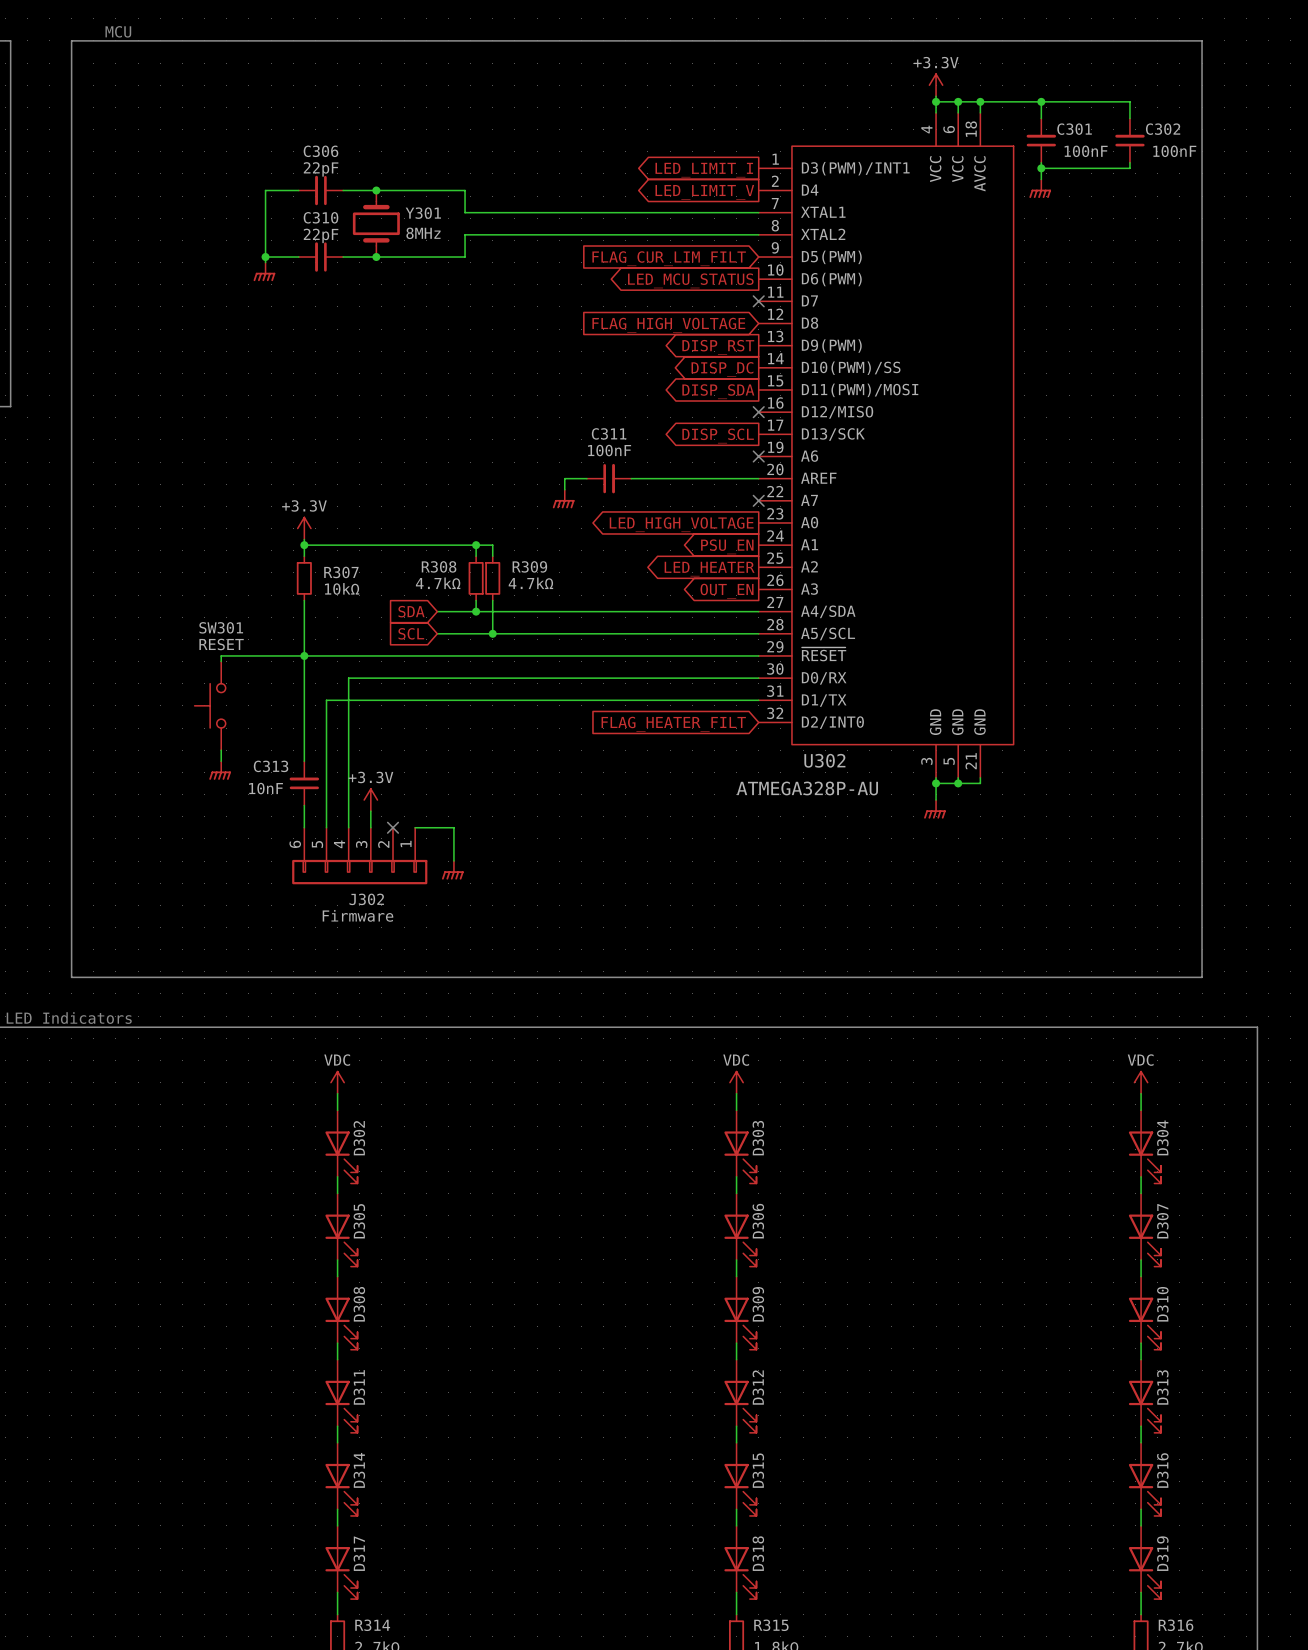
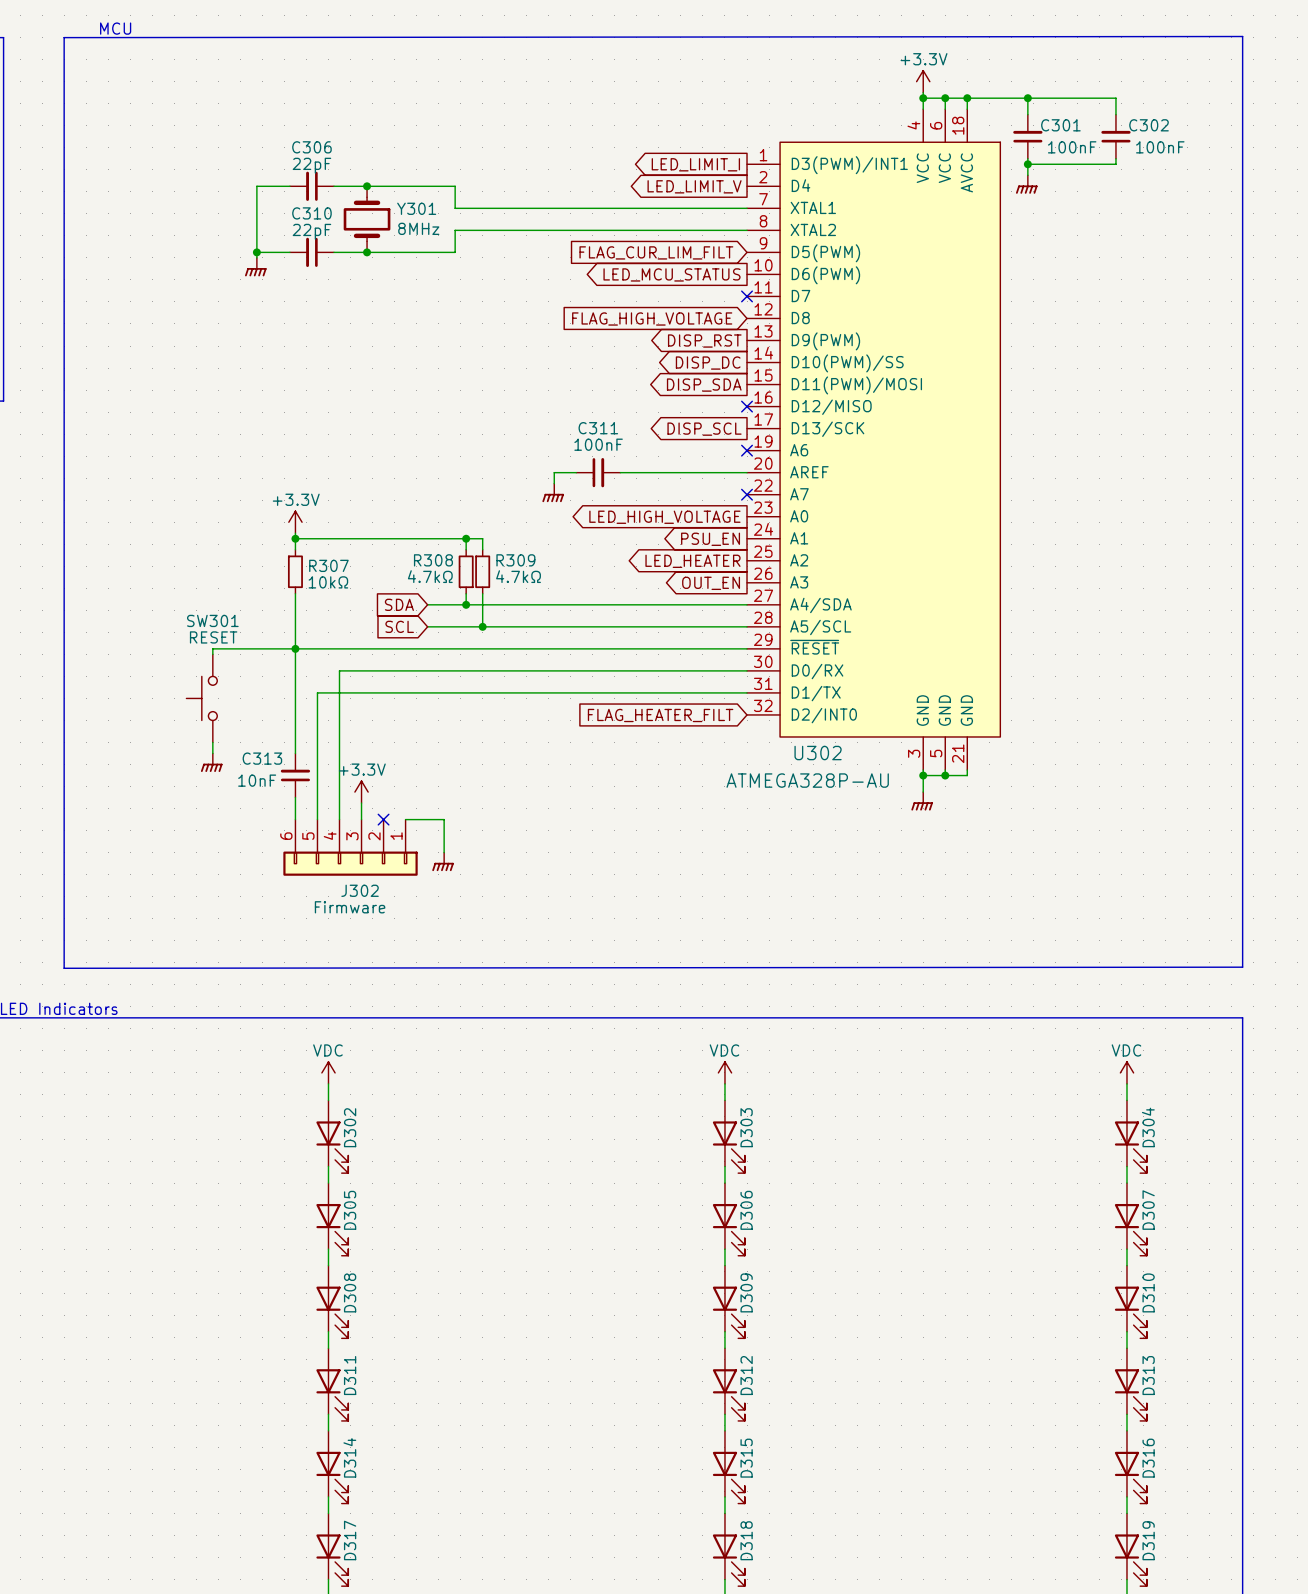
line: (71, 40) (1202, 40) (1202, 977) (71, 977) -> (64, 37) (1242, 36) (1242, 967) (64, 968)

